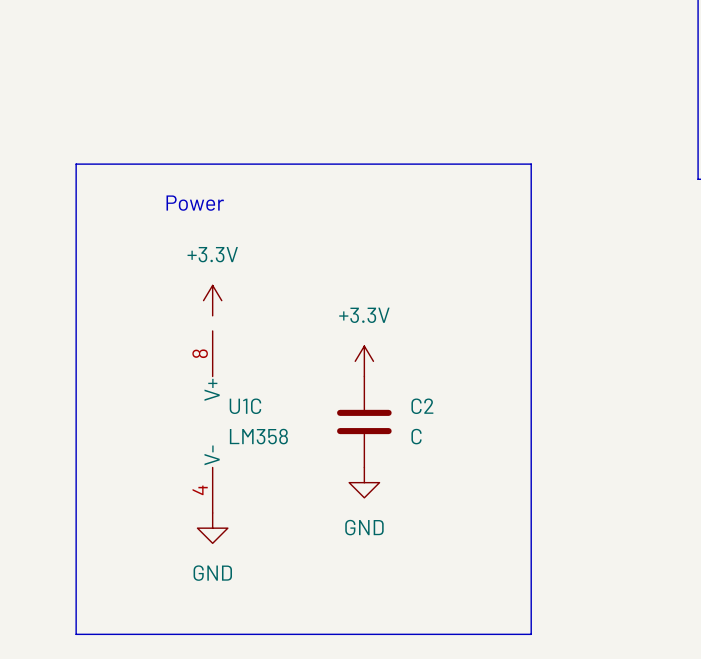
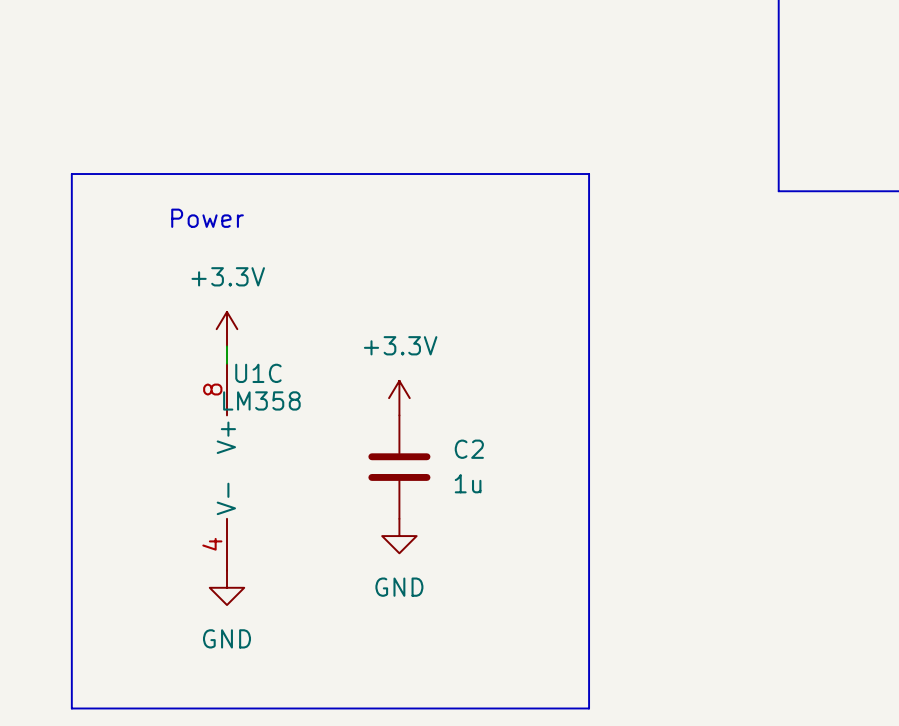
wire: none -> (227, 346) (227, 363)
U1C name position: U1C (245, 406) -> U1C (258, 373)
U1C value position: LM358 (258, 436) -> LM358 (261, 400)
C2 value: C (416, 436) -> 1u (468, 483)

